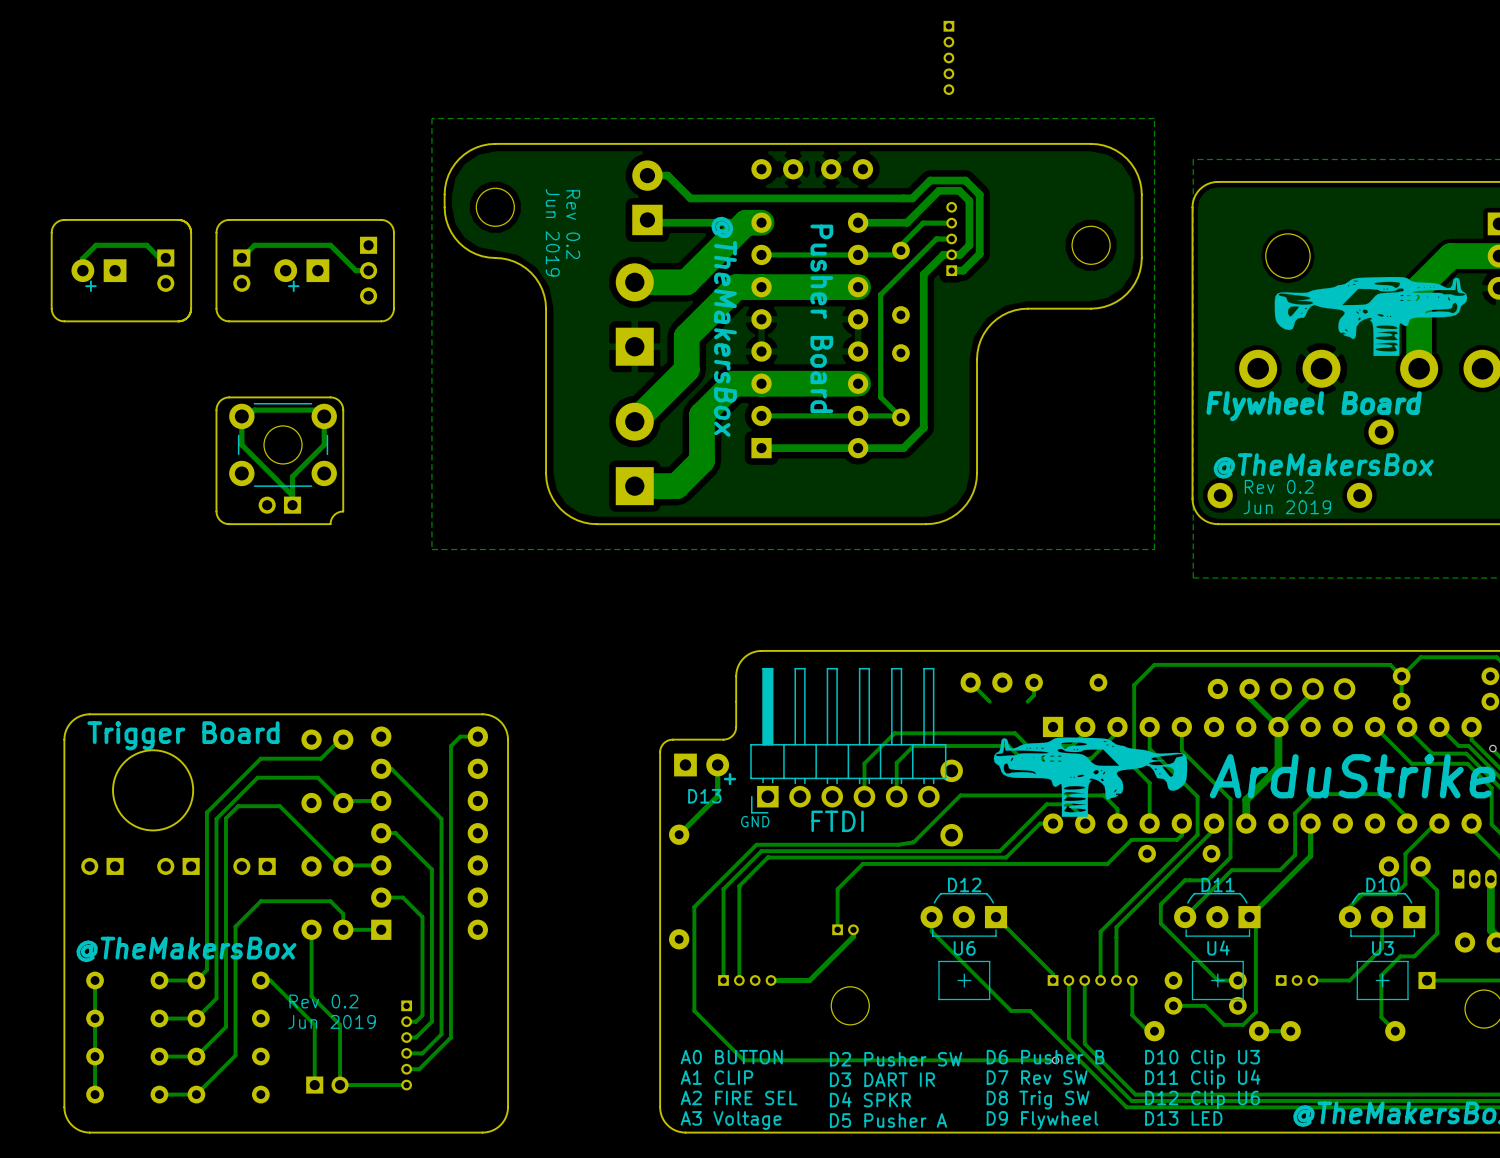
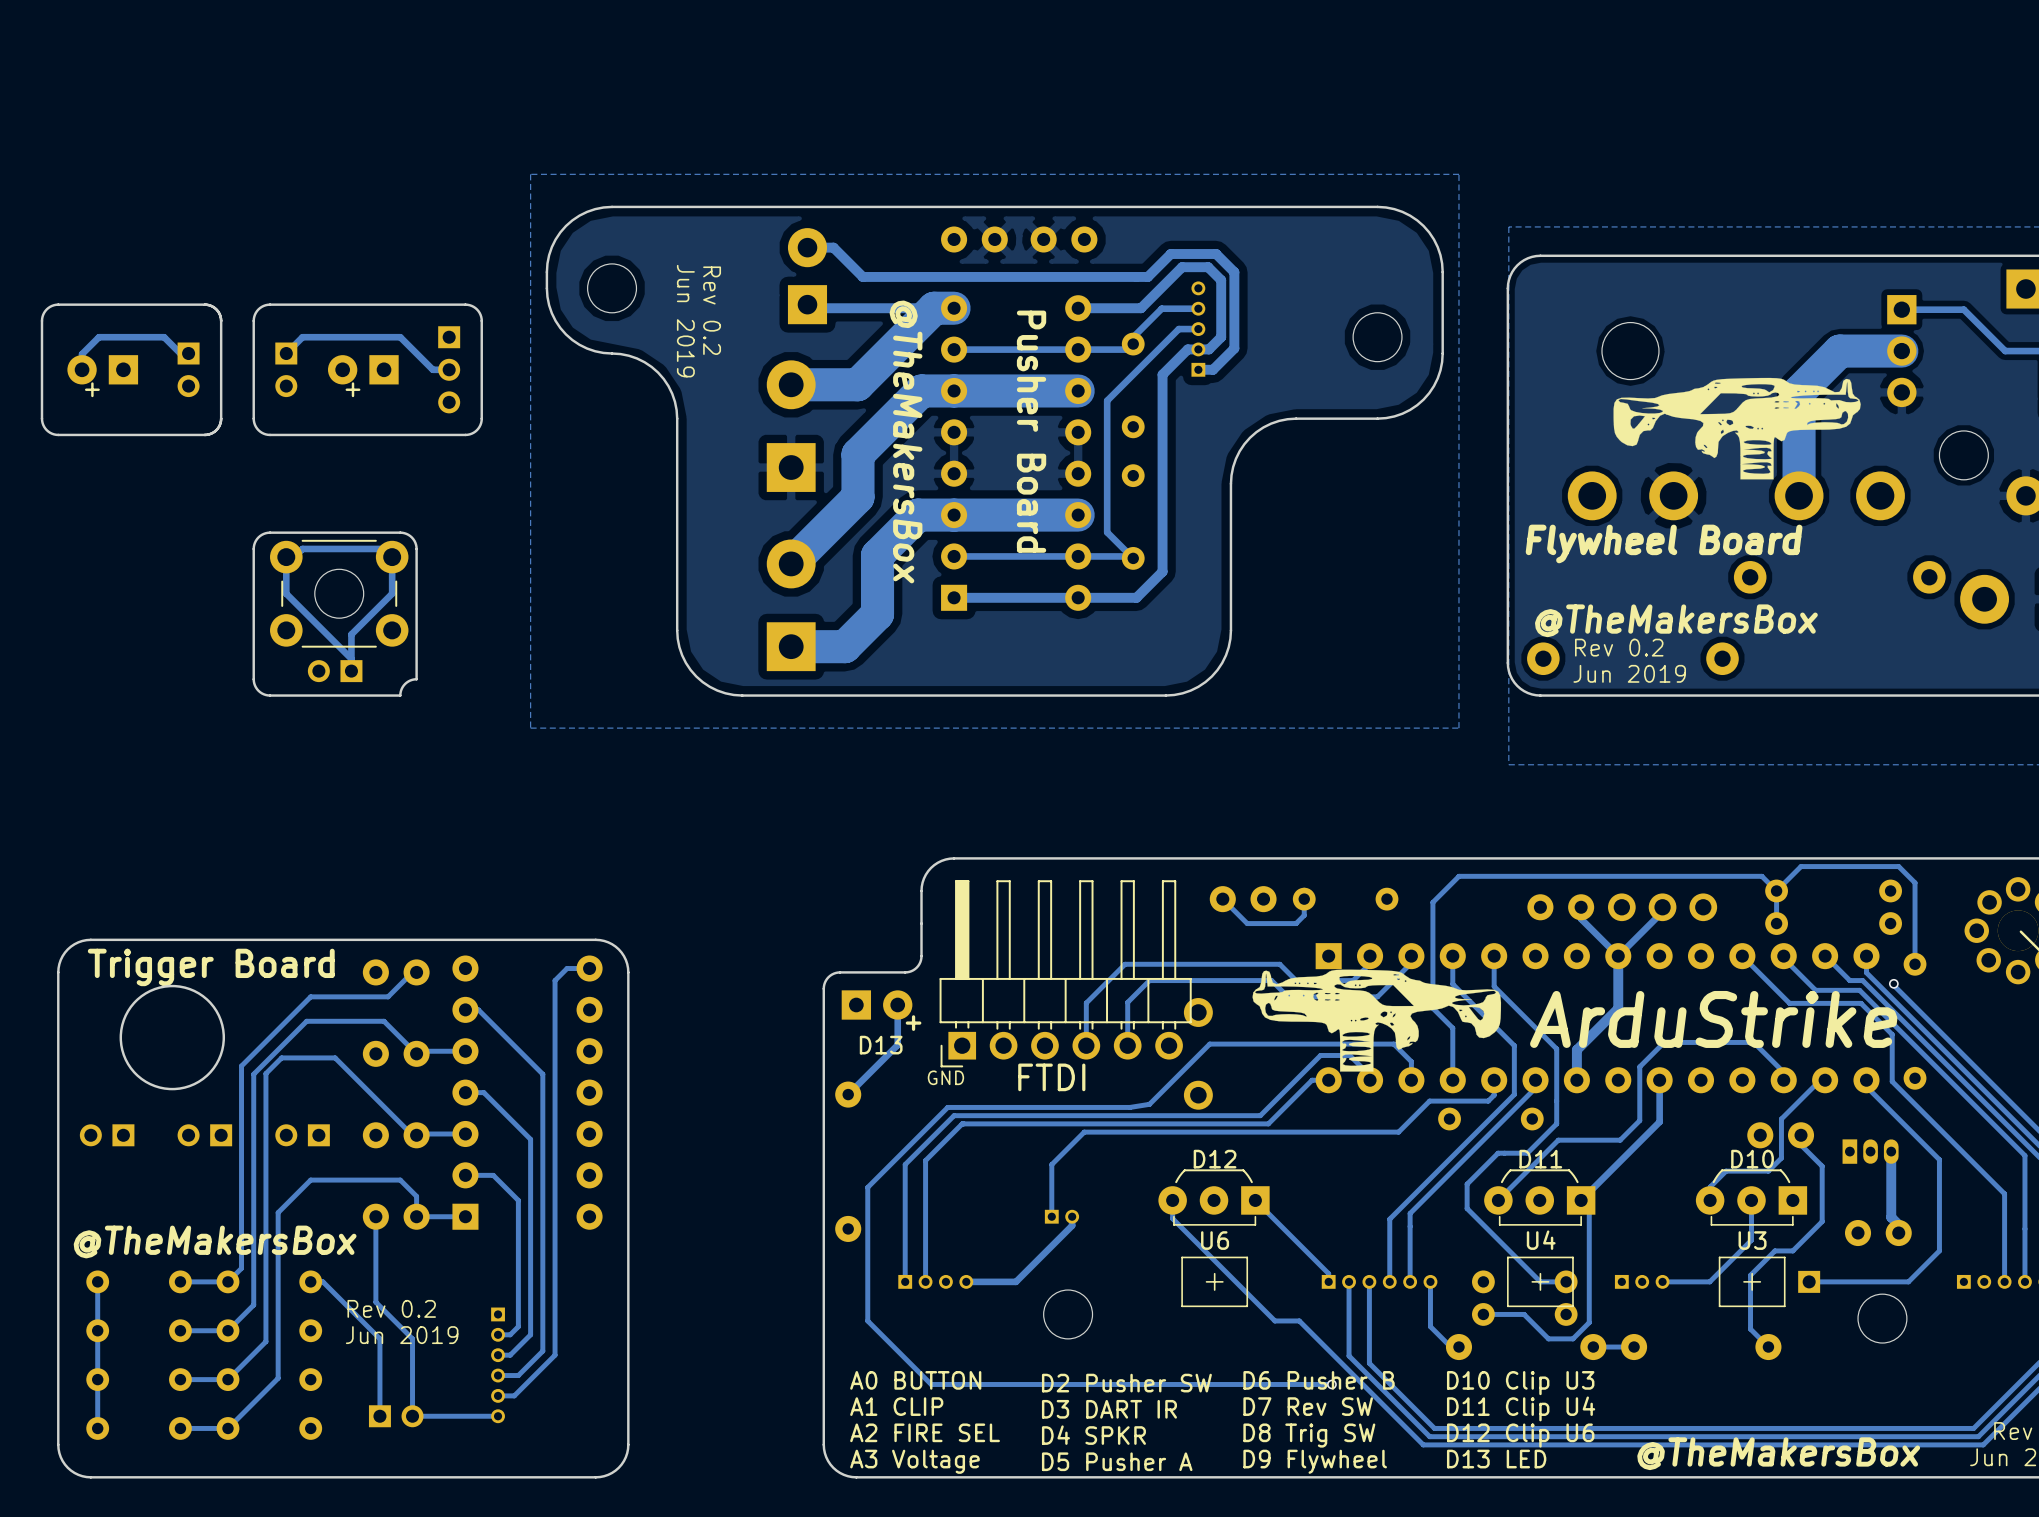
part: (948, 57) -> none
track: none -> (1296, 923) (1247, 923)

